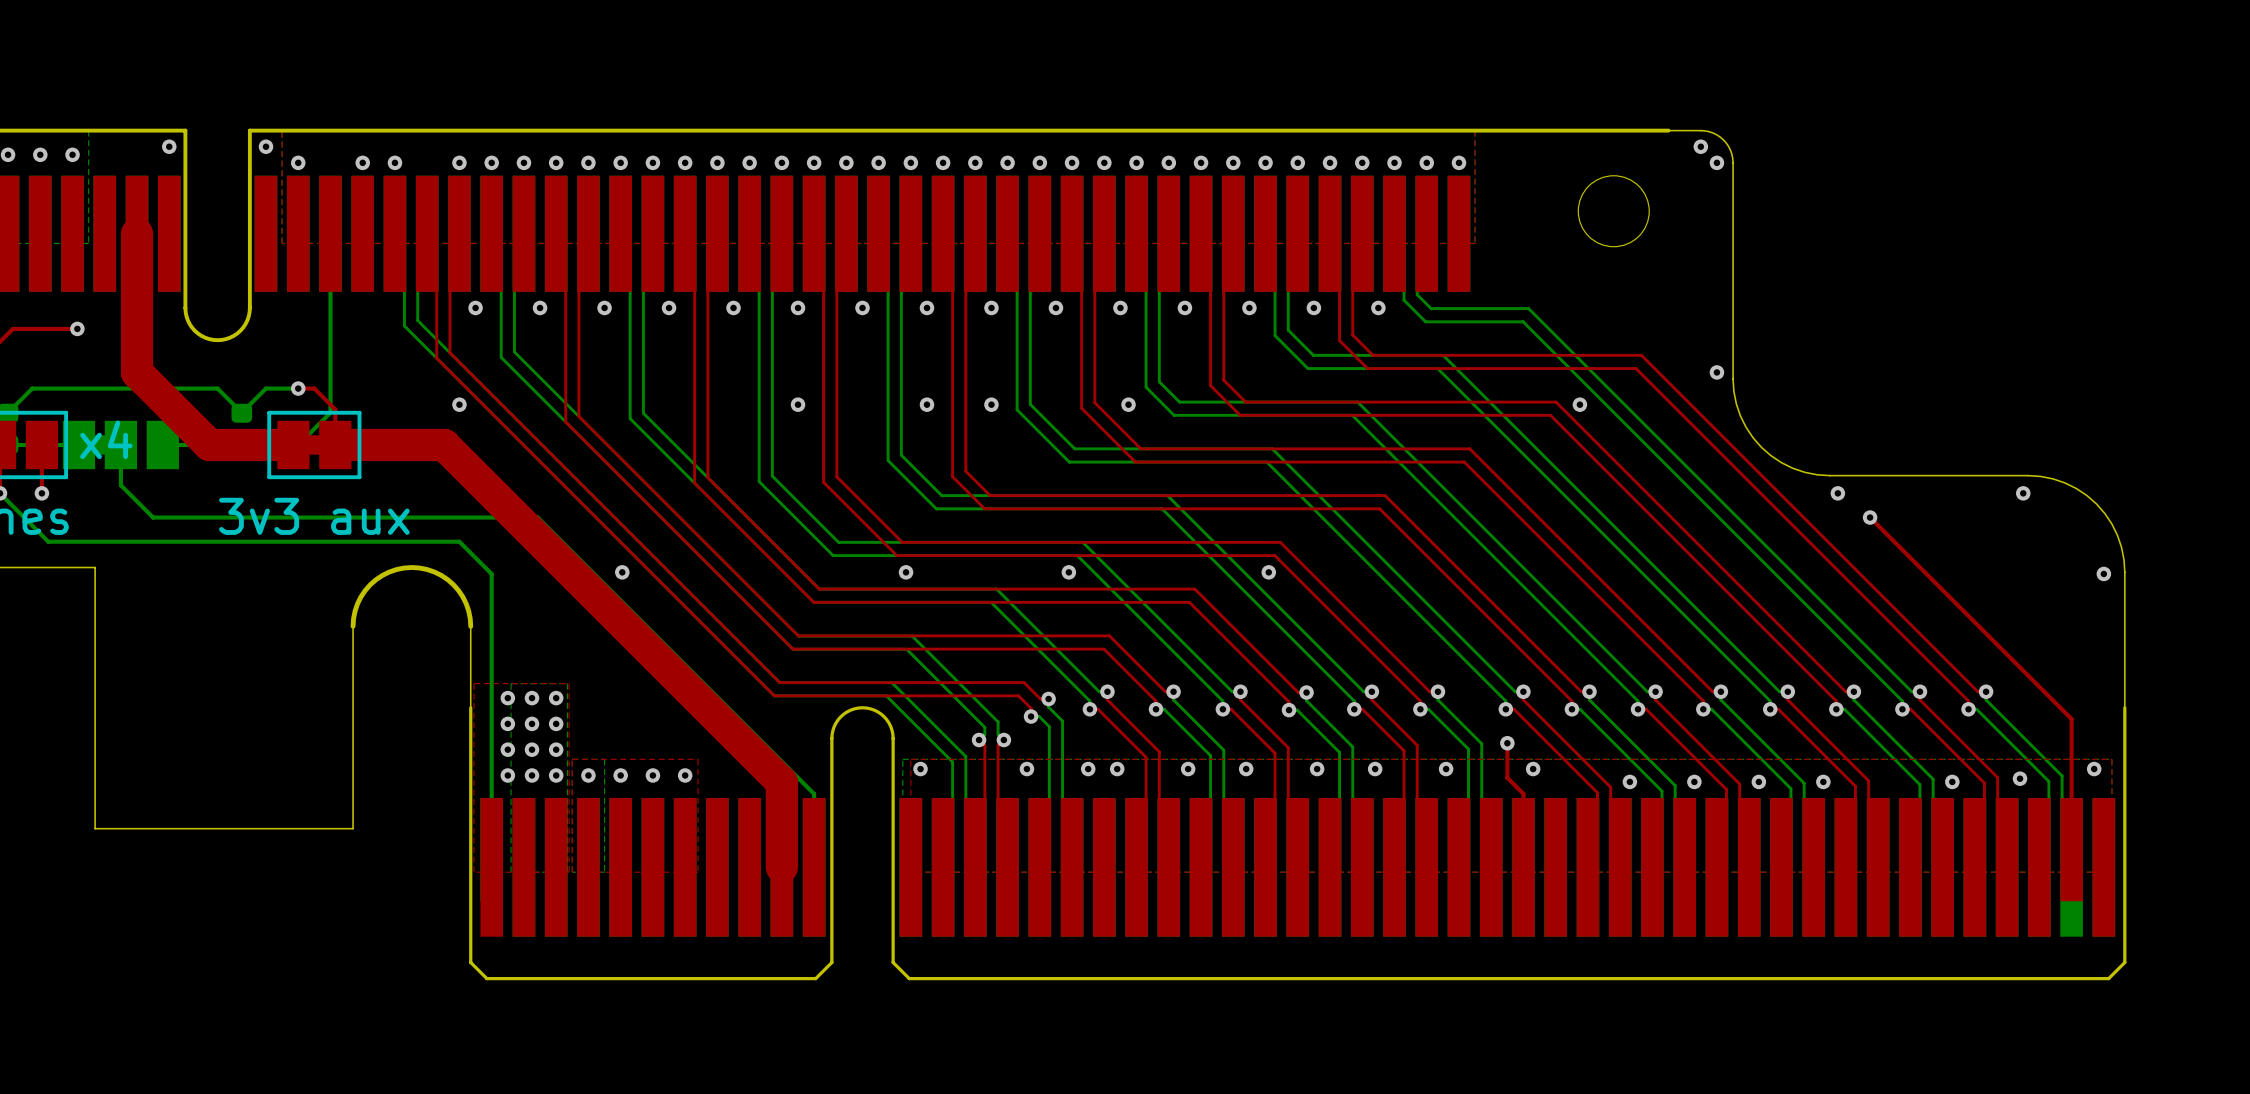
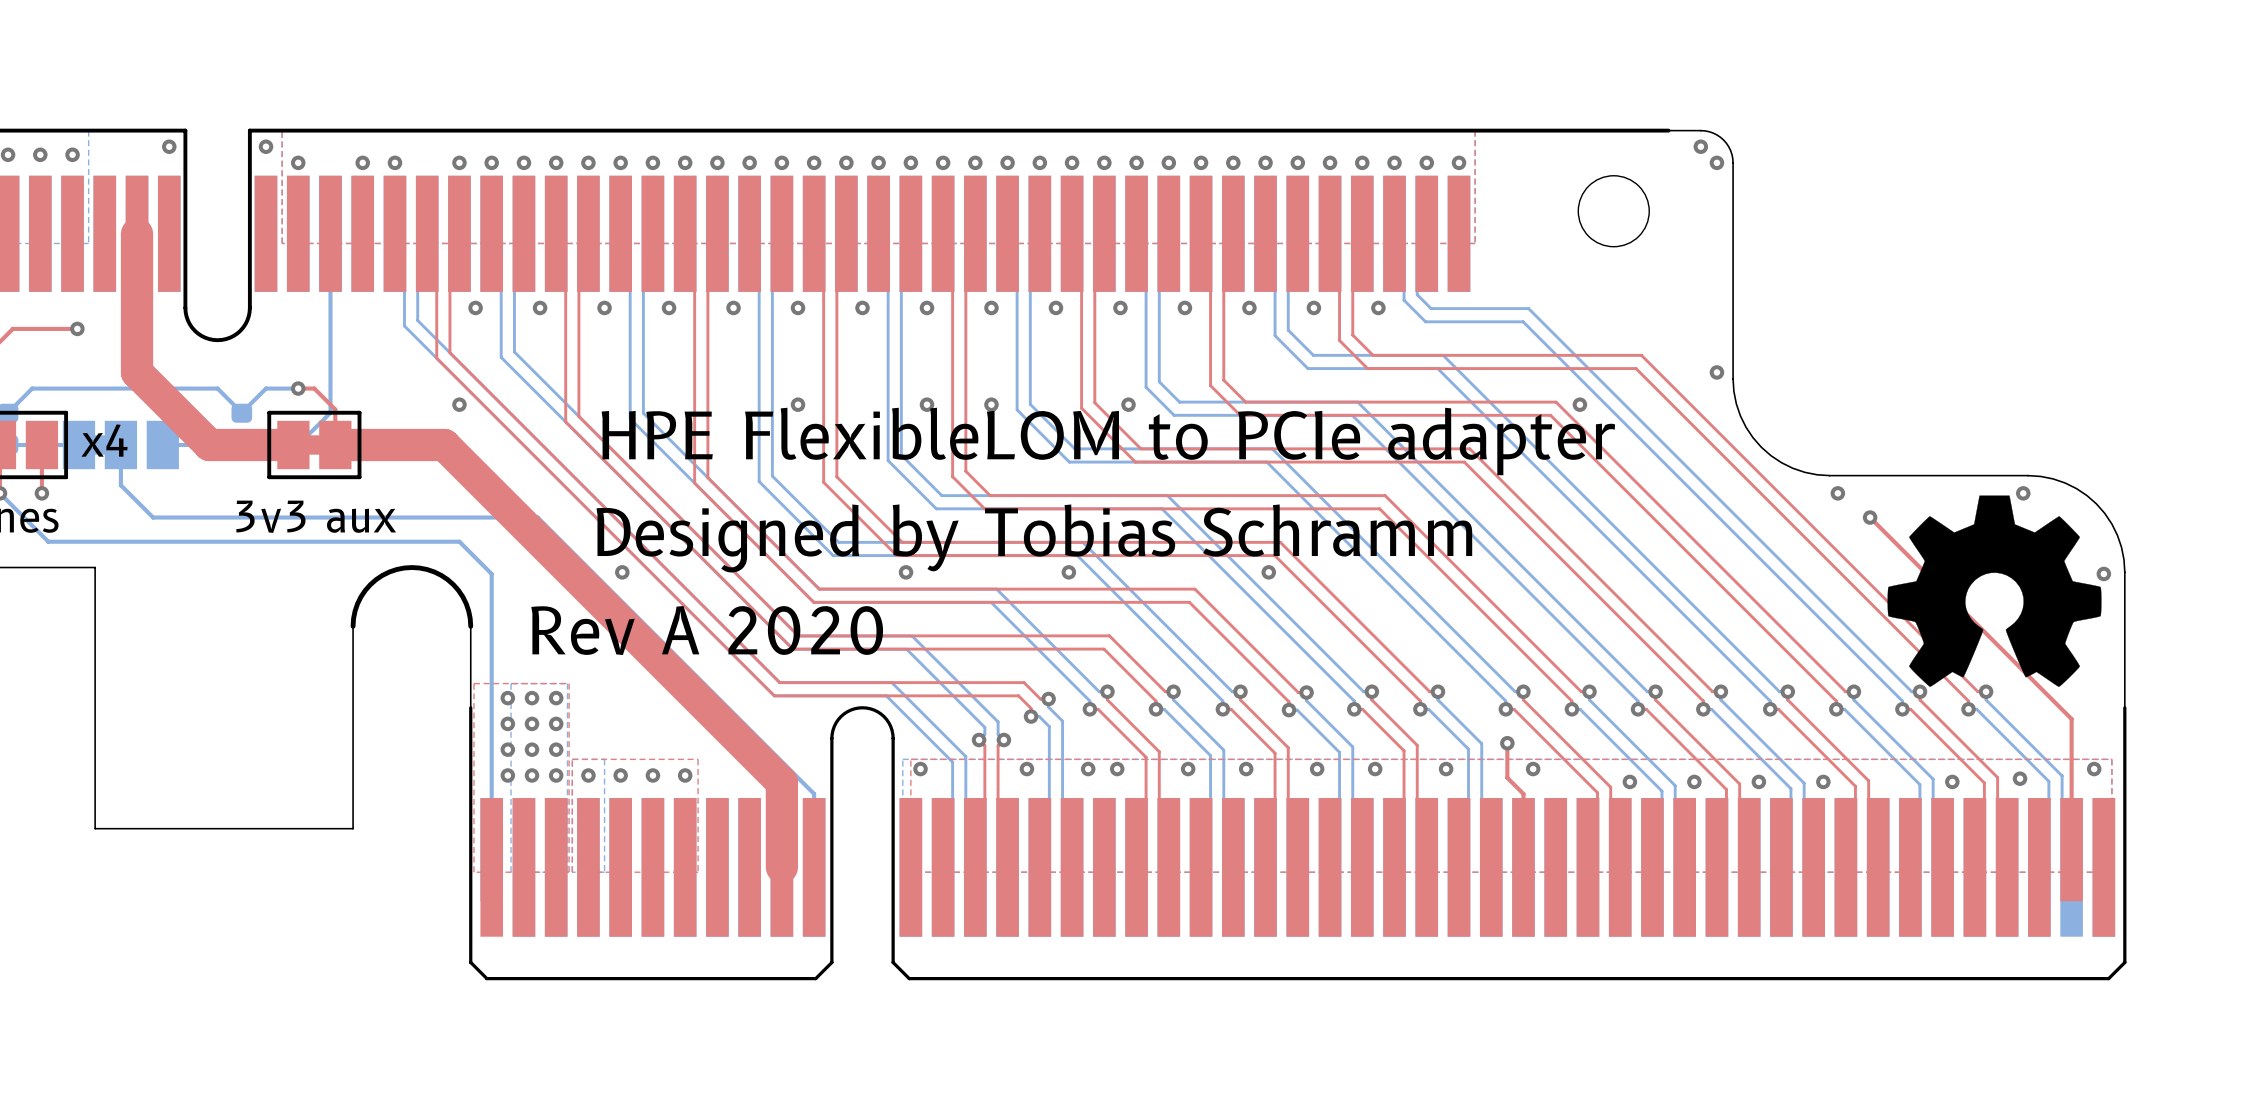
text: none -> HPE FlexibleLOM to PCIe adapter (1108, 441)
drawing: none -> [1887, 495, 2102, 687]
text: none -> Designed by Tobias Schramm (1034, 538)
text: none -> Rev A 2020 (707, 630)

